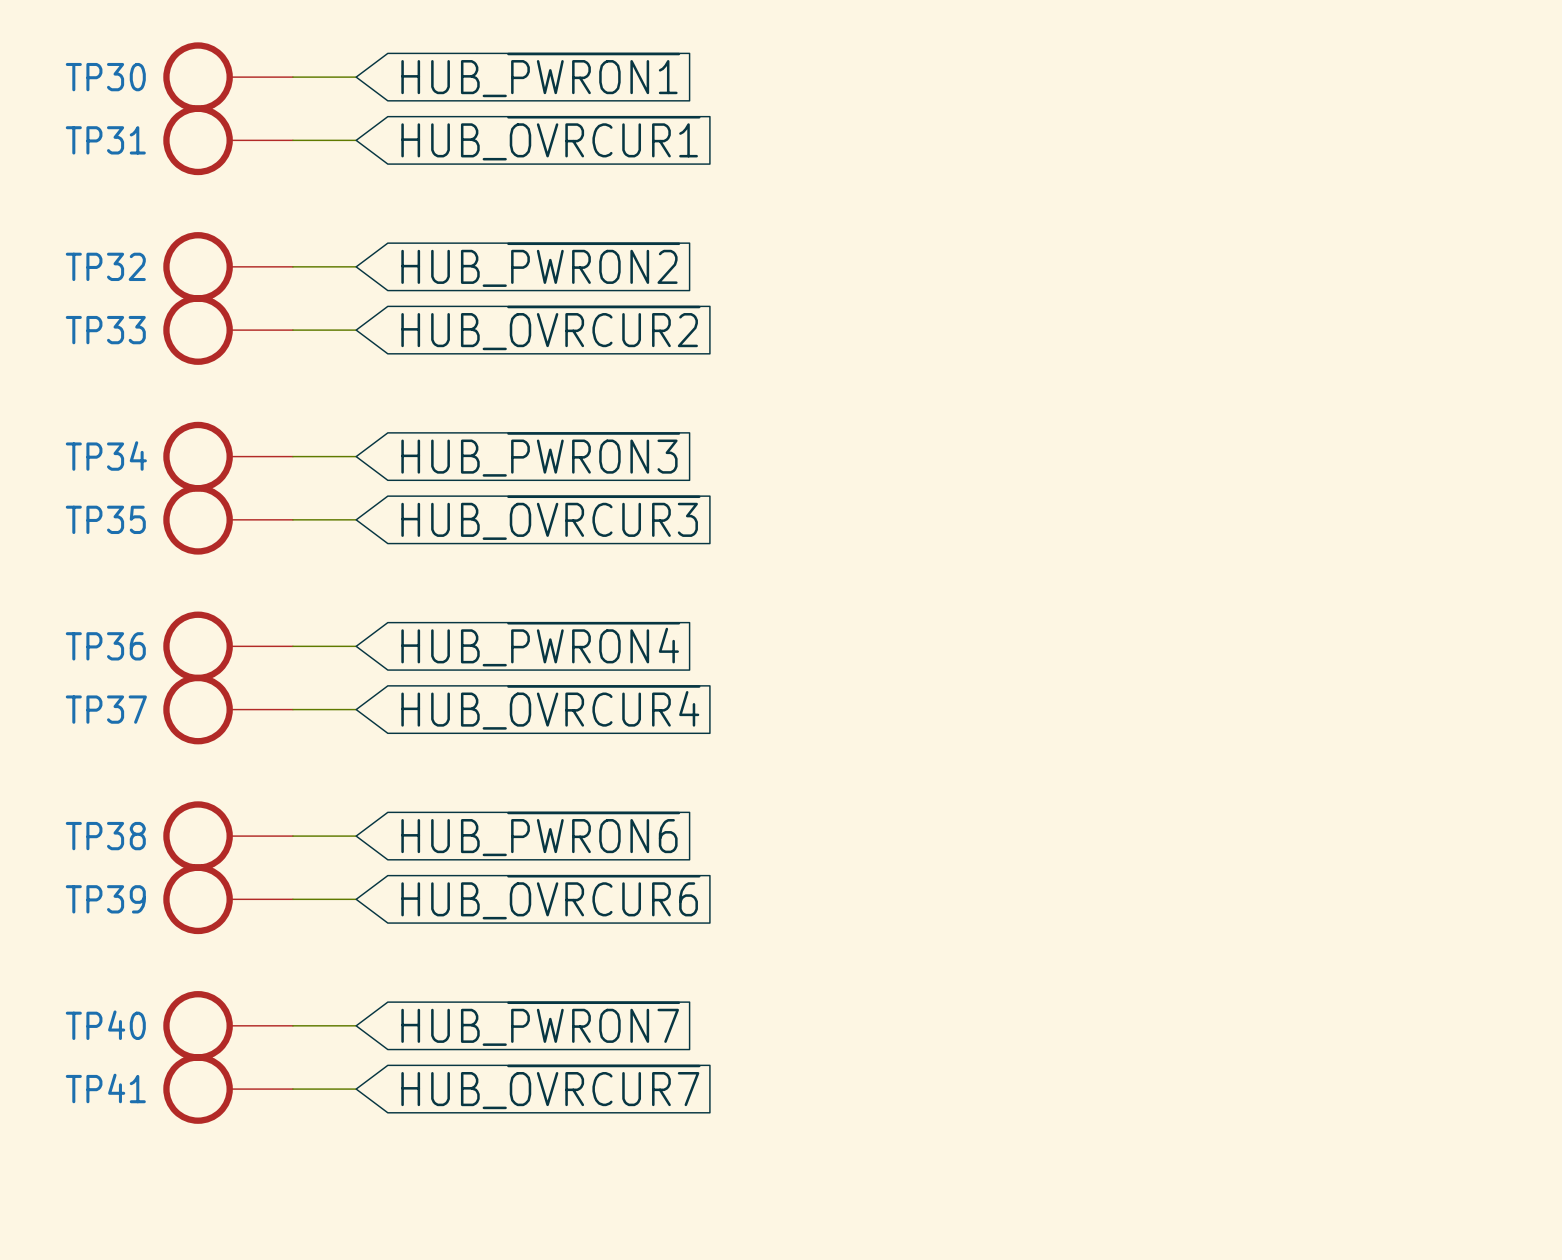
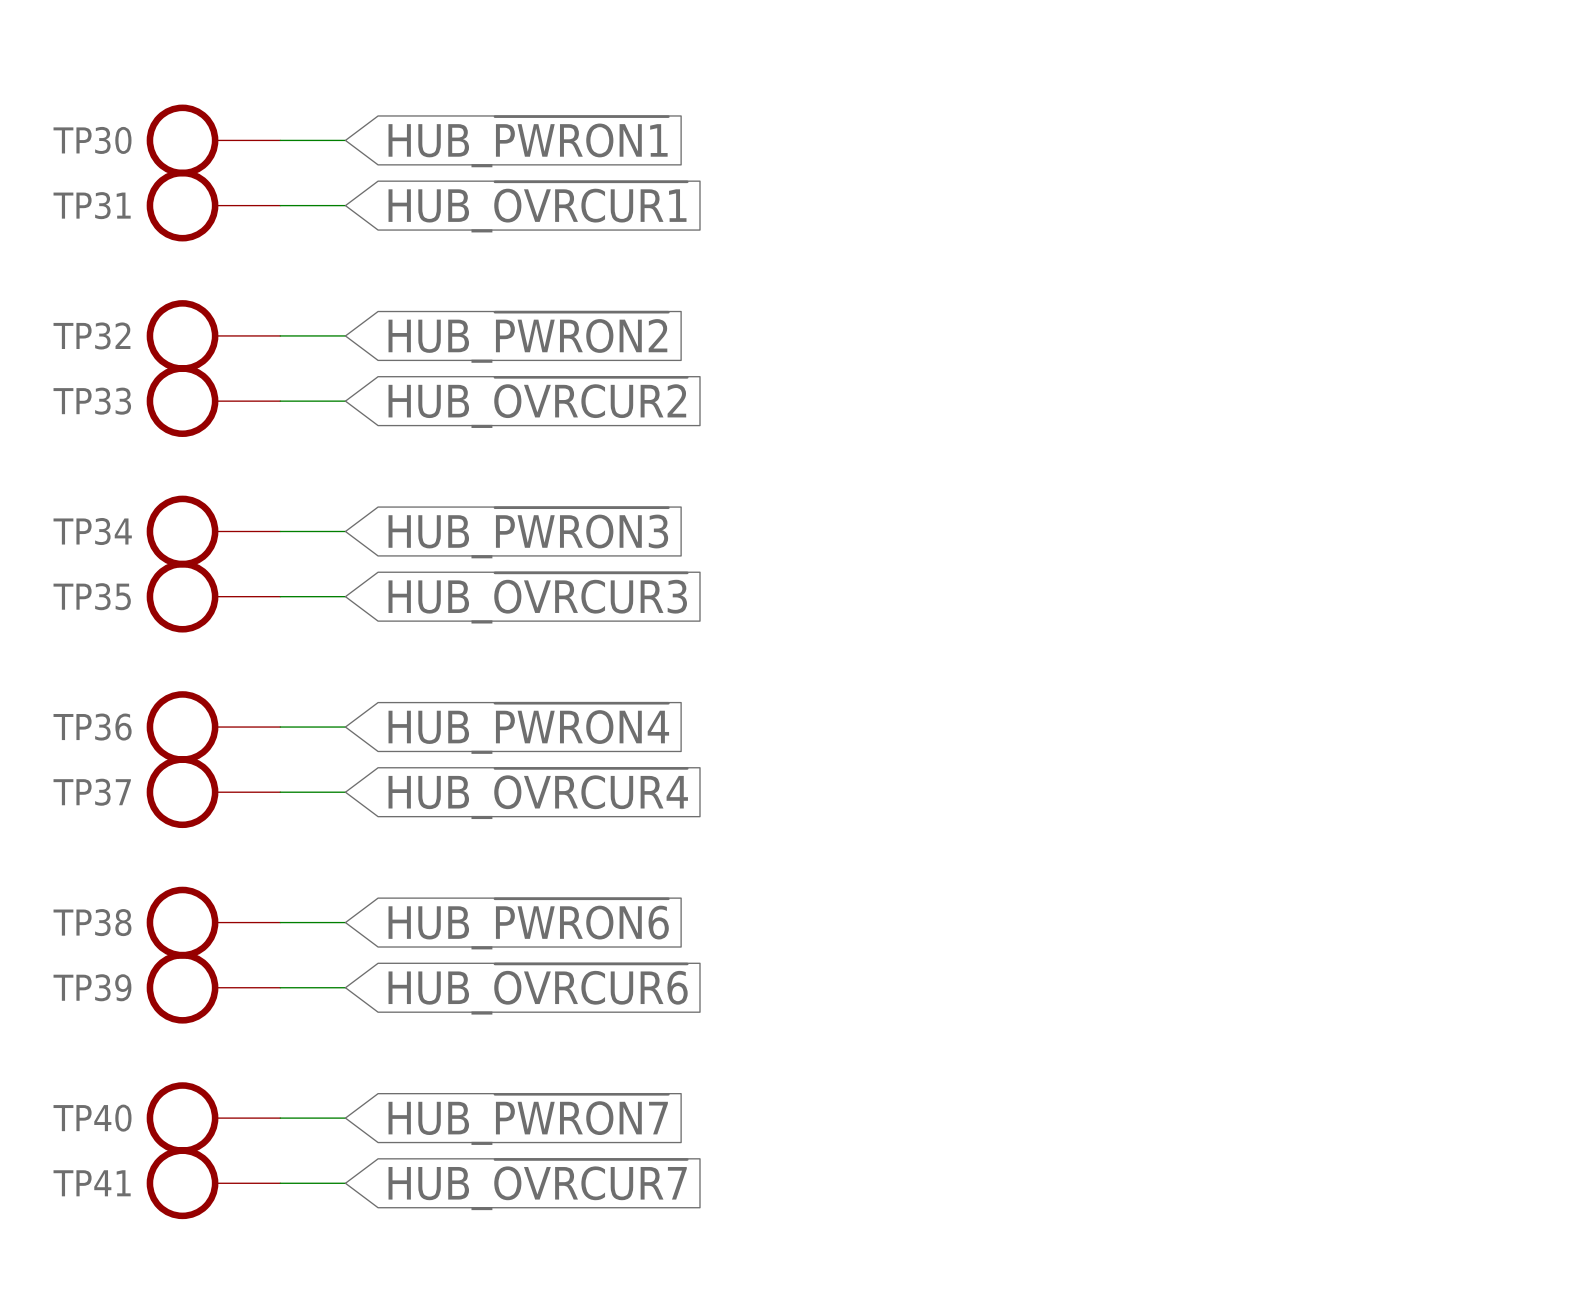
global label: HUB_~{PWRON1} (540, 74) -> none
TP30: (228, 77) -> none
wire: (292, 77) (356, 77) -> (280, 205) (345, 205)
global label: HUB_~{OVRCUR1} (550, 138) -> HUB_~{PWRON1} (528, 141)
TP31 name: TP31 (105, 140) -> TP30 (92, 140)
global label: none -> HUB_~{OVRCUR1} (537, 207)
TP31: none -> (213, 205)
global label: HUB_~{PWRON2} (540, 264) -> none
TP32: (228, 266) -> none
wire: (292, 266) (356, 266) -> (280, 401) (345, 401)
global label: HUB_~{OVRCUR2} (550, 327) -> HUB_~{PWRON2} (528, 337)
TP33 name: TP33 (105, 330) -> TP32 (91, 335)
global label: none -> HUB_~{OVRCUR2} (537, 402)
TP33: none -> (213, 401)
global label: HUB_~{PWRON3} (540, 454) -> none
TP34: (228, 456) -> none
wire: (292, 456) (356, 456) -> (280, 596) (345, 596)
global label: HUB_~{OVRCUR3} (550, 517) -> HUB_~{PWRON3} (528, 533)
TP35 name: TP35 (105, 519) -> TP34 (92, 531)
global label: none -> HUB_~{OVRCUR3} (537, 598)
TP35: none -> (213, 596)
global label: HUB_~{PWRON4} (540, 644) -> none
TP36: (228, 646) -> none
wire: (292, 646) (356, 646) -> (280, 792) (345, 792)
global label: HUB_~{OVRCUR4} (550, 707) -> HUB_~{PWRON4} (528, 728)
TP37 name: TP37 (106, 709) -> TP36 (92, 727)
global label: none -> HUB_~{OVRCUR4} (538, 793)
TP37: none -> (213, 792)
global label: HUB_~{PWRON6} (540, 833) -> none
TP38: (228, 836) -> none
wire: (292, 836) (356, 836) -> (280, 987) (345, 987)
global label: HUB_~{OVRCUR6} (550, 897) -> HUB_~{PWRON6} (528, 924)
TP39 name: TP39 (105, 899) -> TP38 (92, 922)
global label: none -> HUB_~{OVRCUR6} (538, 989)
TP39: none -> (213, 987)
global label: HUB_~{PWRON7} (540, 1023) -> none
TP40: (228, 1025) -> none
wire: (292, 1025) (356, 1025) -> (280, 1183) (345, 1183)
global label: HUB_~{OVRCUR7} (550, 1086) -> HUB_~{PWRON7} (528, 1119)
TP41 name: TP41 (105, 1088) -> TP40 (92, 1118)
global label: none -> HUB_~{OVRCUR7} (537, 1184)
TP41: none -> (213, 1183)

